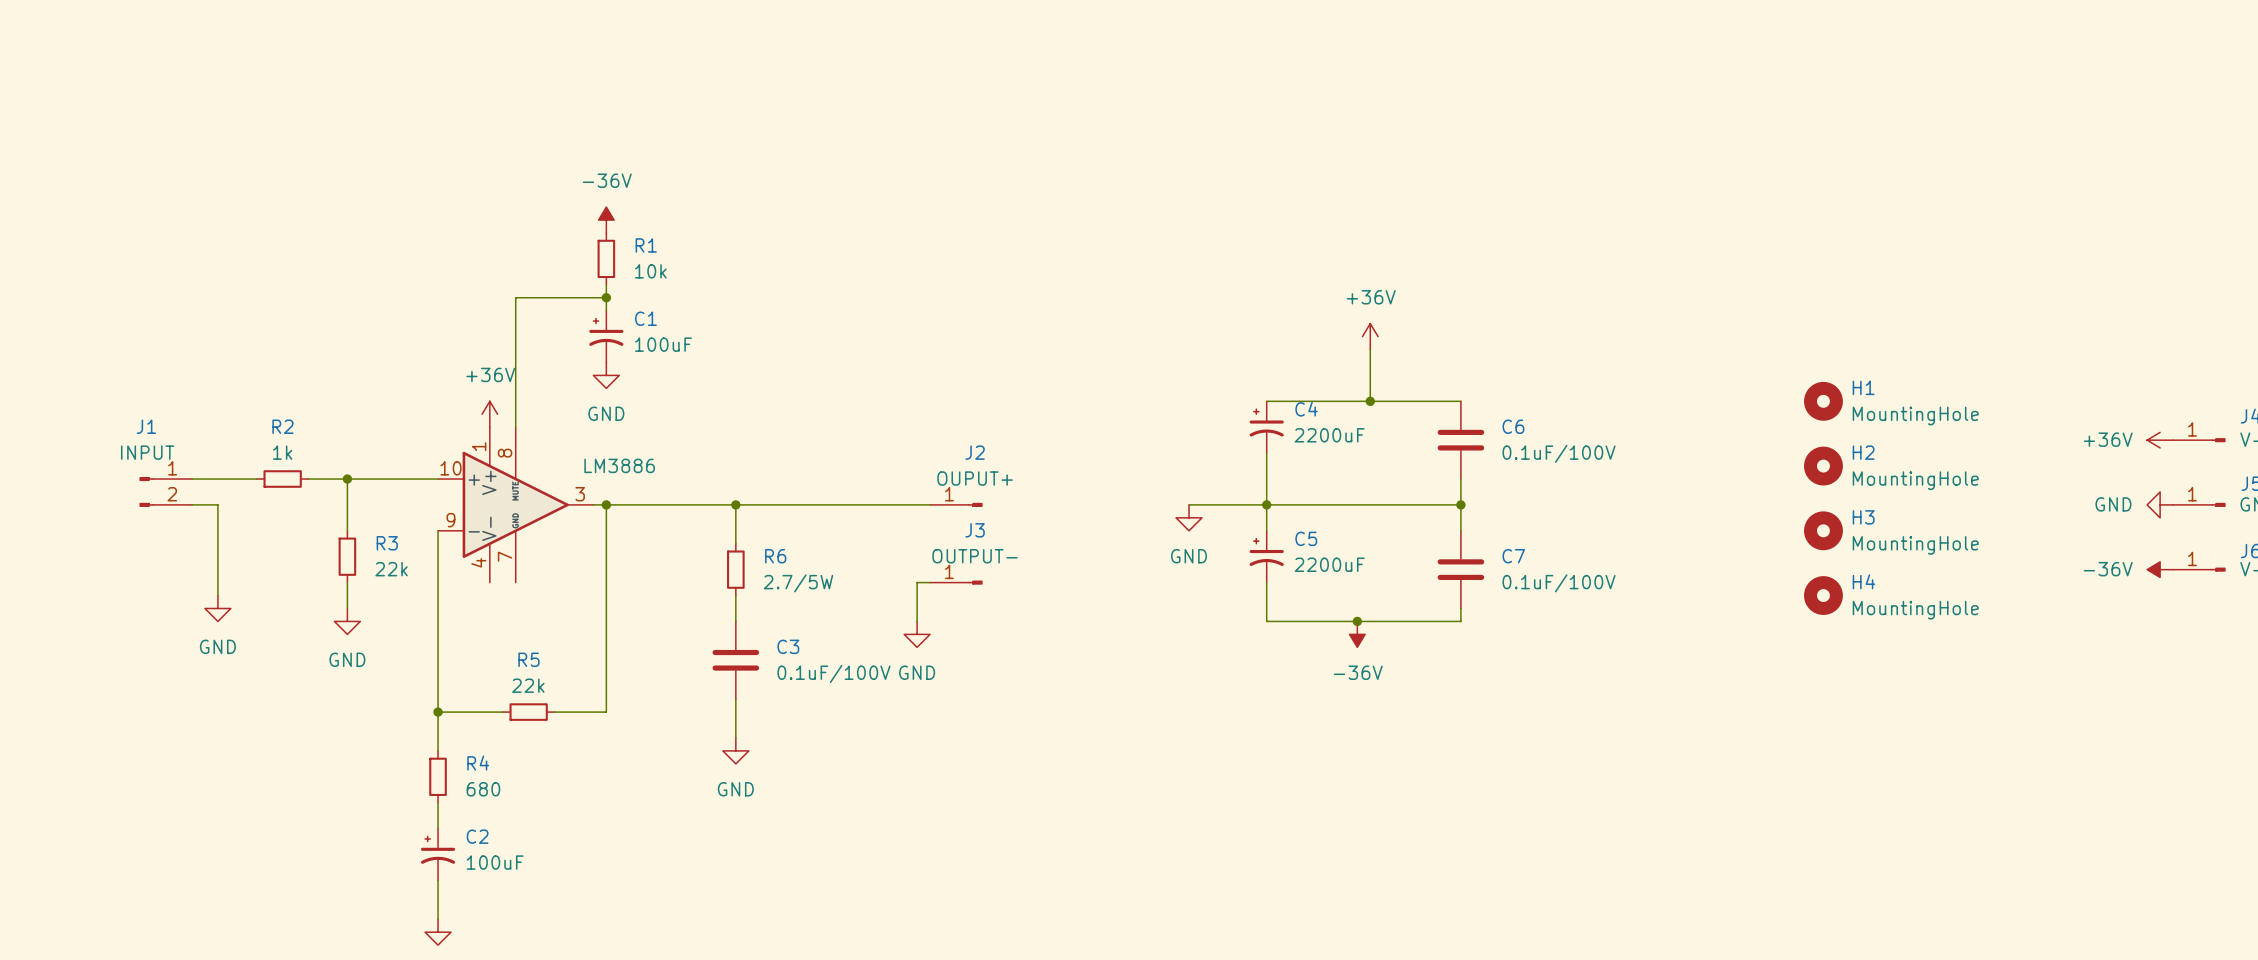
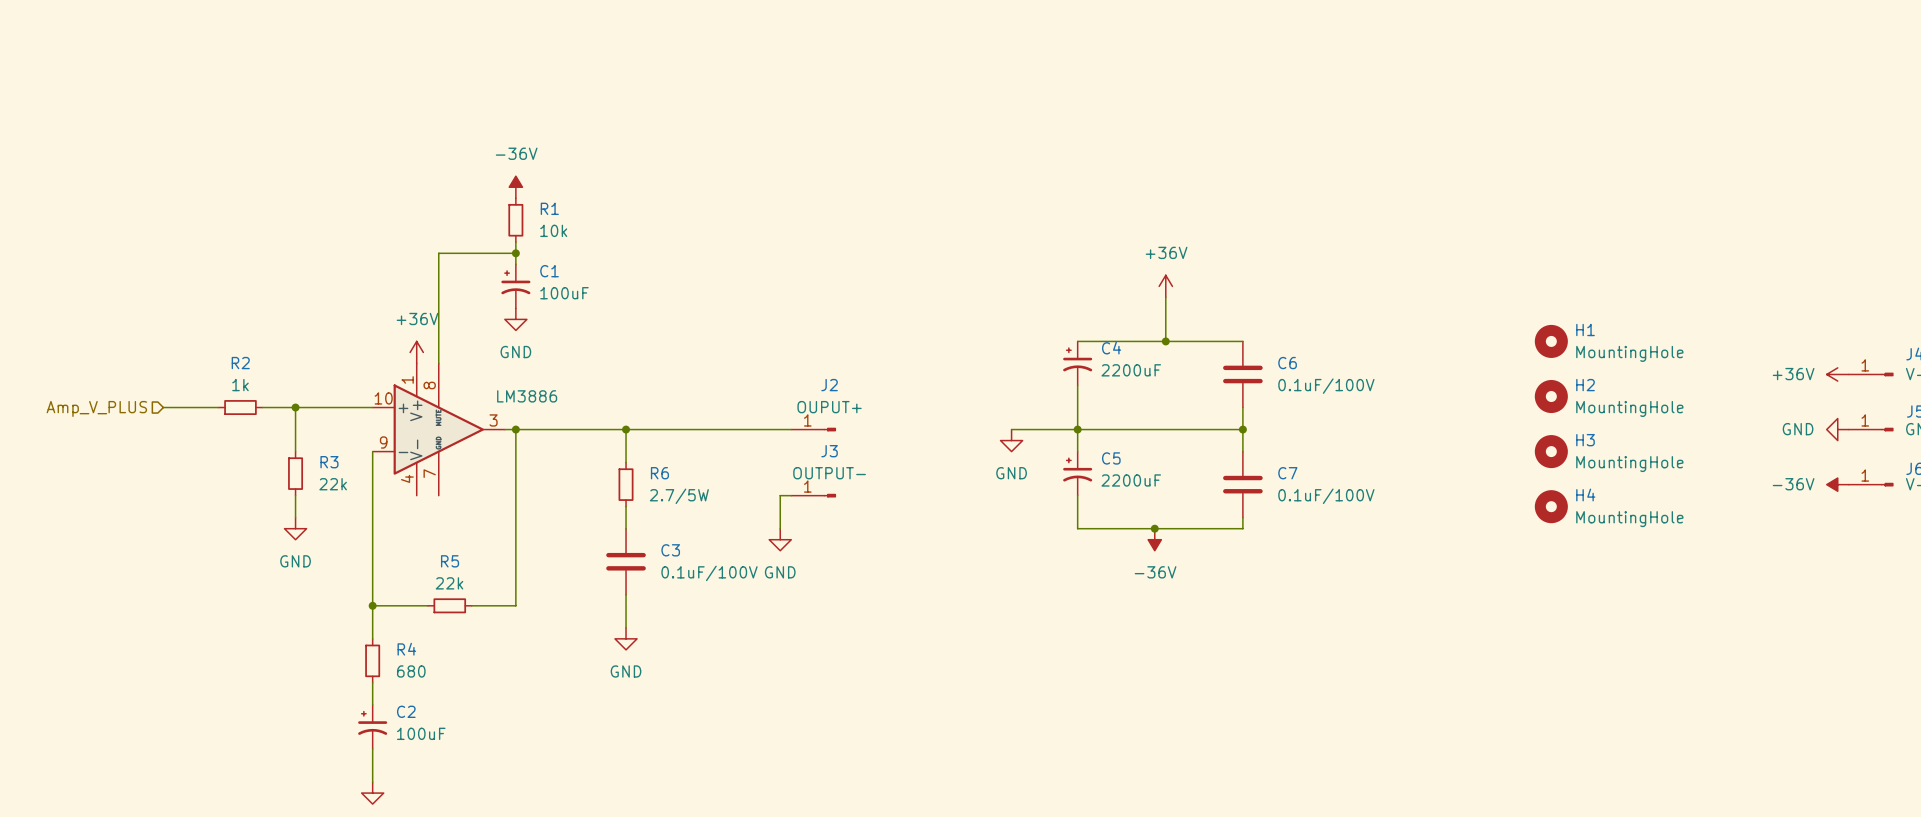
hierarchical label: none -> Amp_V_PLUS (96, 408)
J1: INPUT (165, 491) -> none
wire: (192, 504) (217, 504) (217, 595) -> none
power symbol: GND (217, 608) -> none

